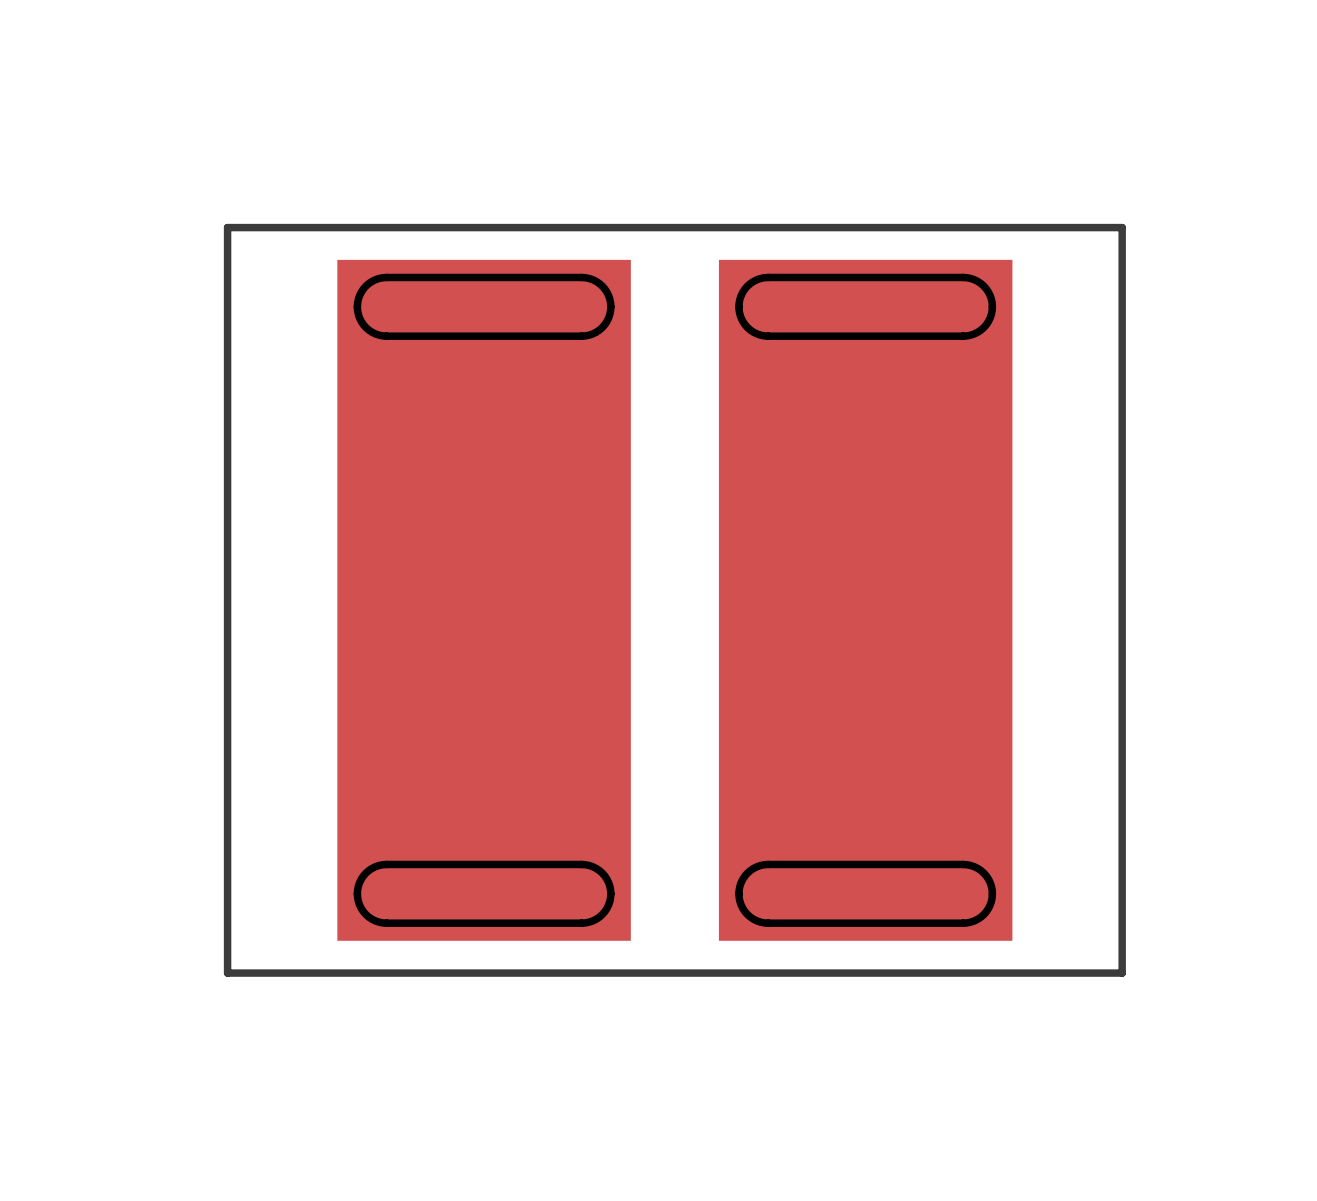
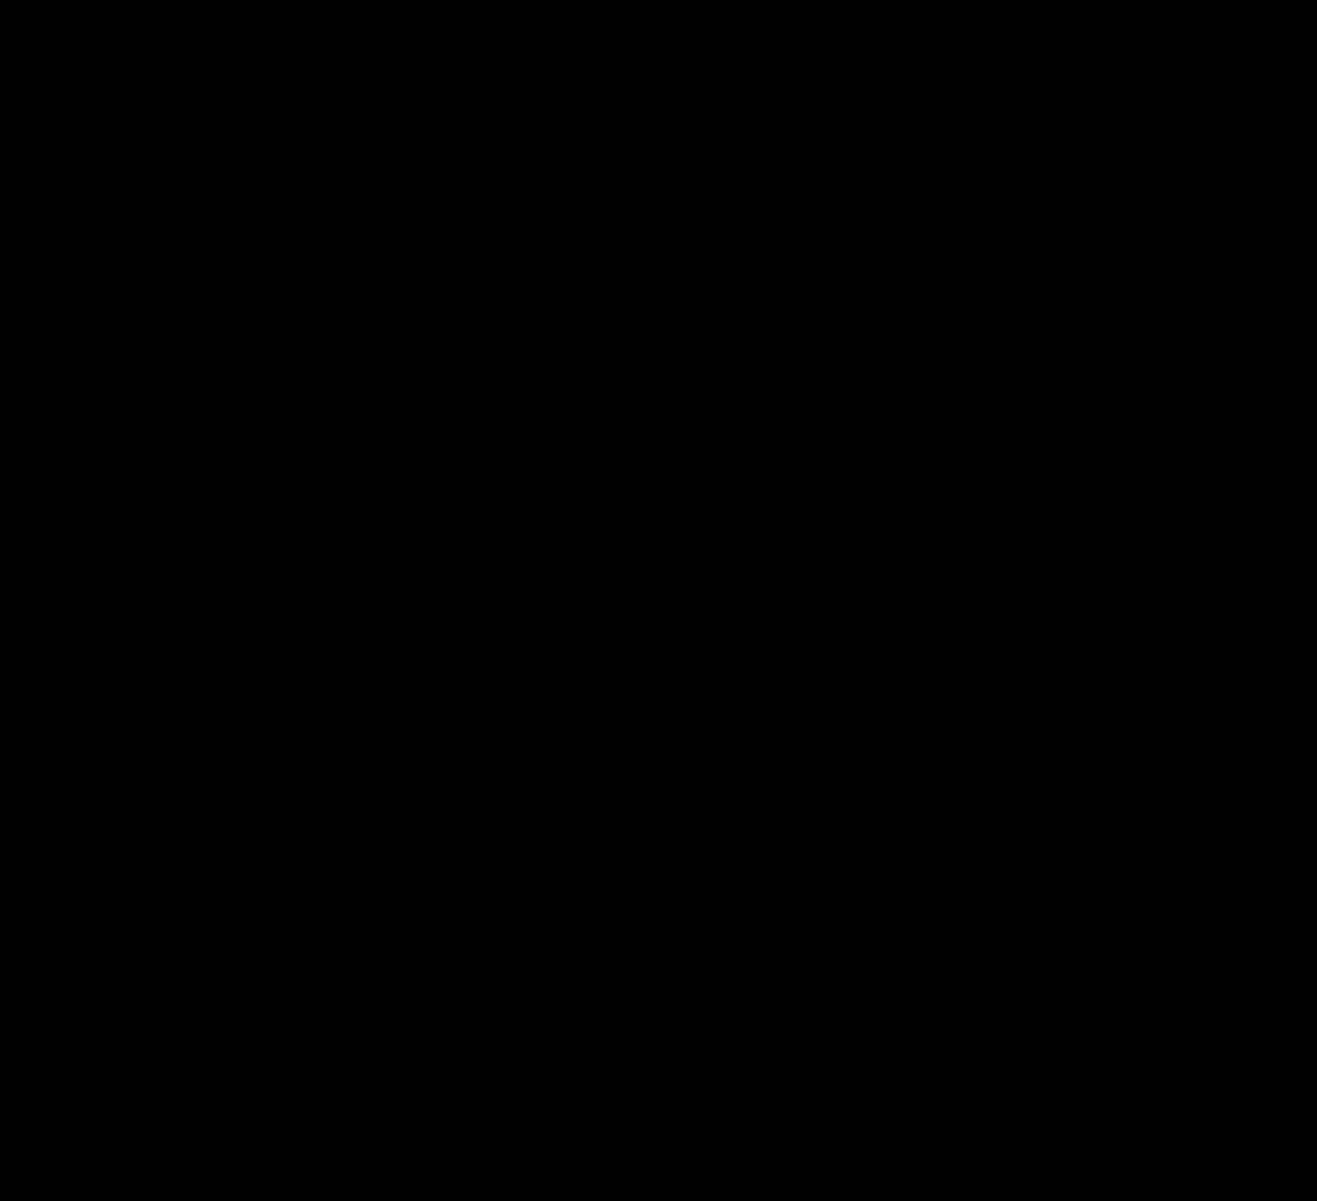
part: (674, 600) -> none

